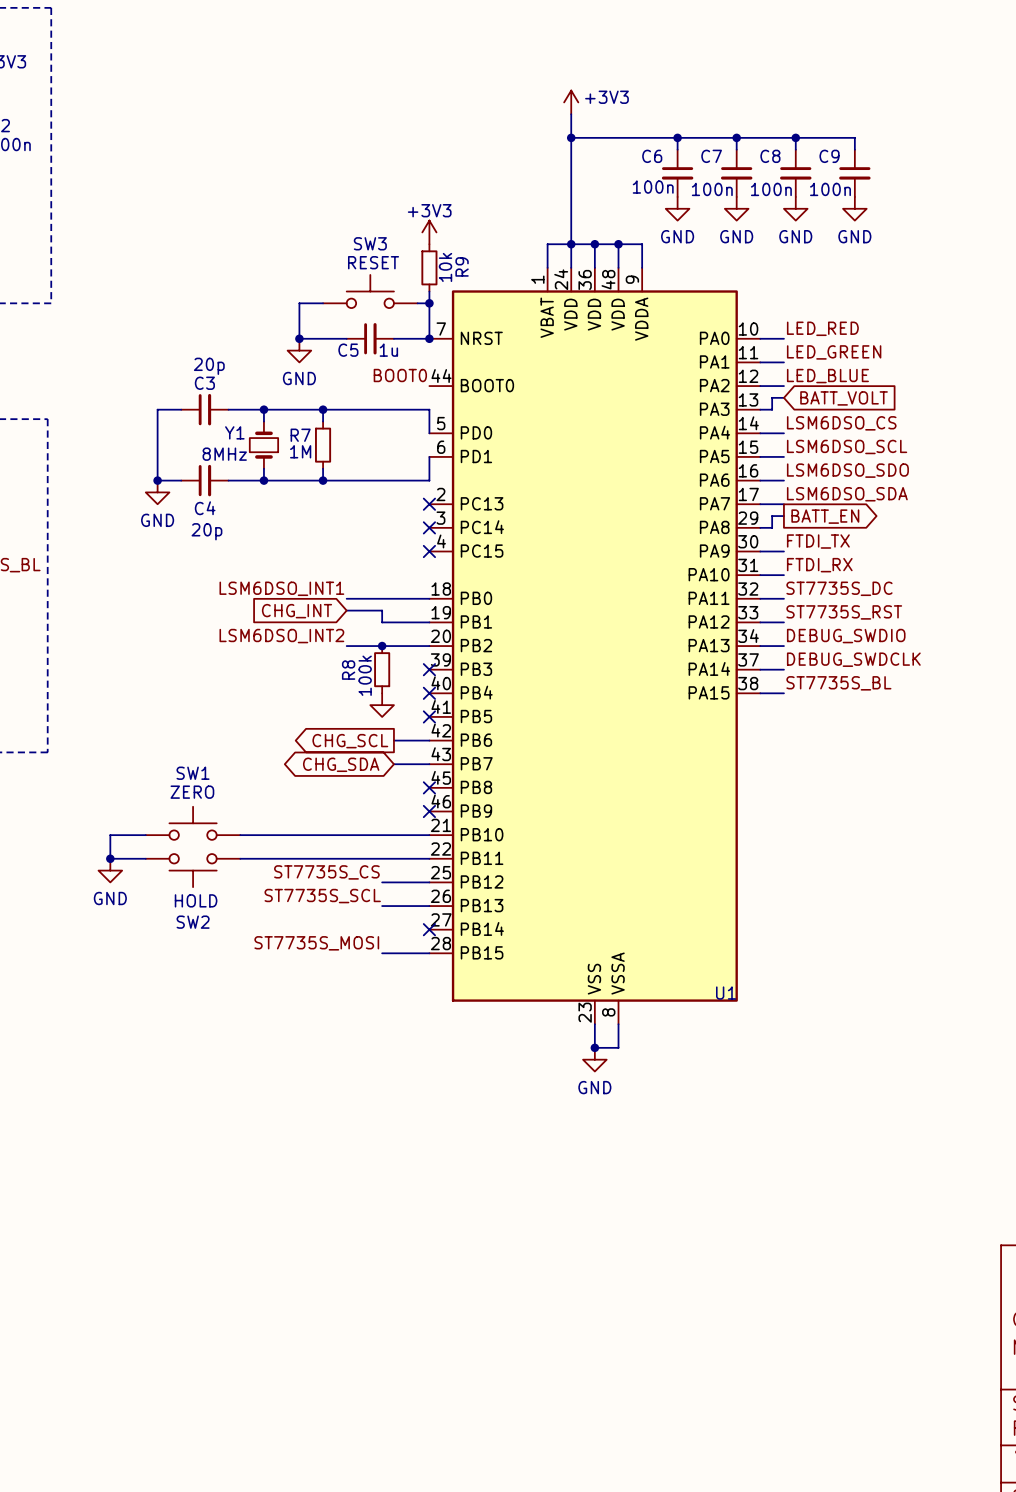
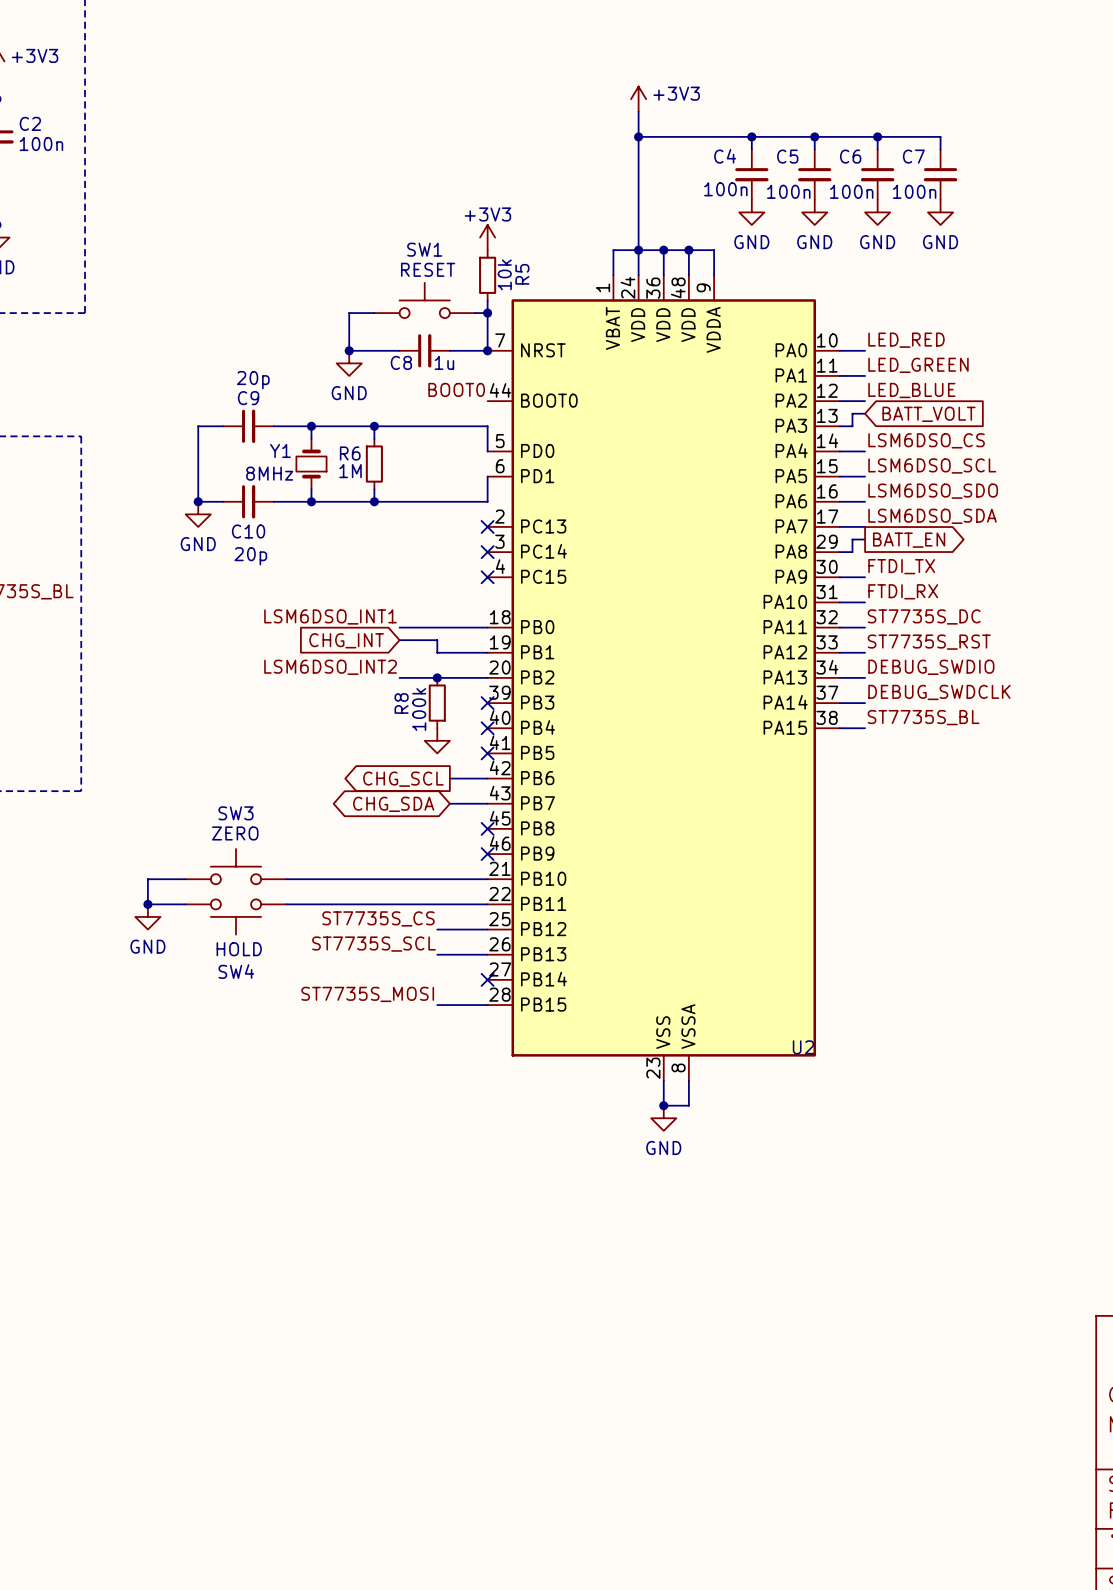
C6 name: C6 (652, 156) -> C4 (725, 156)
C7 name: C7 (711, 156) -> C5 (787, 156)
C8 name: C8 (770, 156) -> C6 (850, 156)
C9 name: C9 (829, 156) -> C7 (913, 156)
SW3 name: SW3 (370, 243) -> SW1 (424, 249)
R9 name: R9 (462, 266) -> R5 (522, 274)
C5 name: C5 (348, 350) -> C8 (401, 362)
C3 name: C3 (204, 383) -> C9 (248, 398)
R7 name: R7 (300, 435) -> R6 (350, 453)
C4 name: C4 (205, 508) -> C10 (248, 531)
SW1 name: SW1 (193, 773) -> SW3 (235, 813)
SW2 name: SW2 (193, 922) -> SW4 (236, 971)
U1 name: U1 (726, 993) -> U2 (803, 1047)

